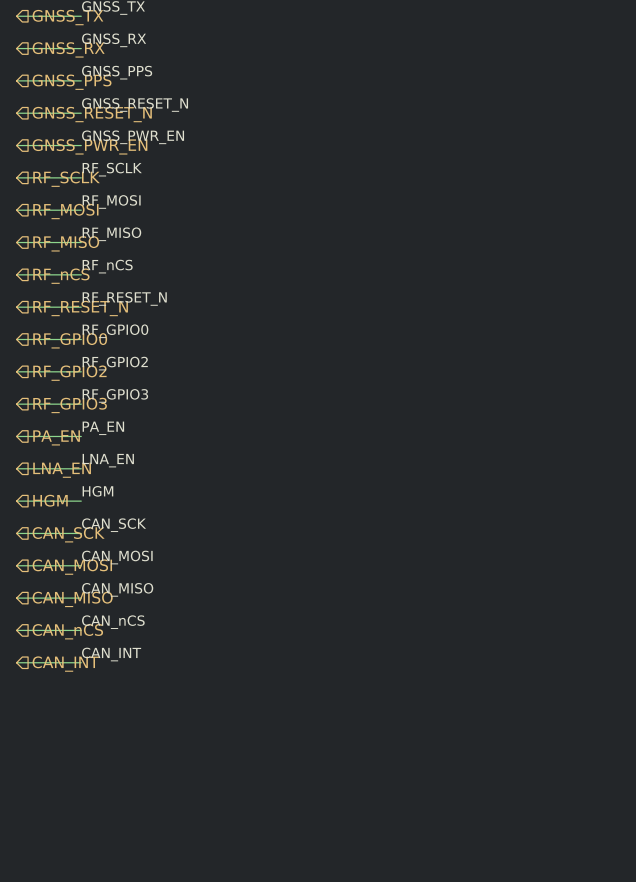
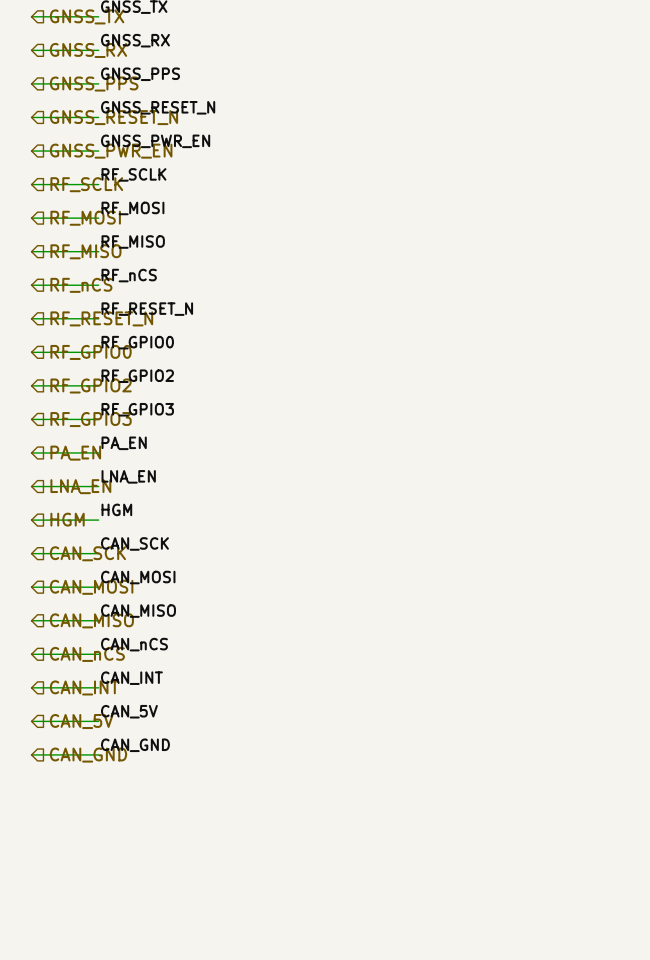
label: none -> CAN_5V (129, 711)
wire: none -> (31, 721) (98, 721)
hierarchical label: none -> CAN_5V (81, 721)
label: none -> CAN_GND (135, 745)
wire: none -> (31, 754) (98, 754)
hierarchical label: none -> CAN_GND (88, 755)

